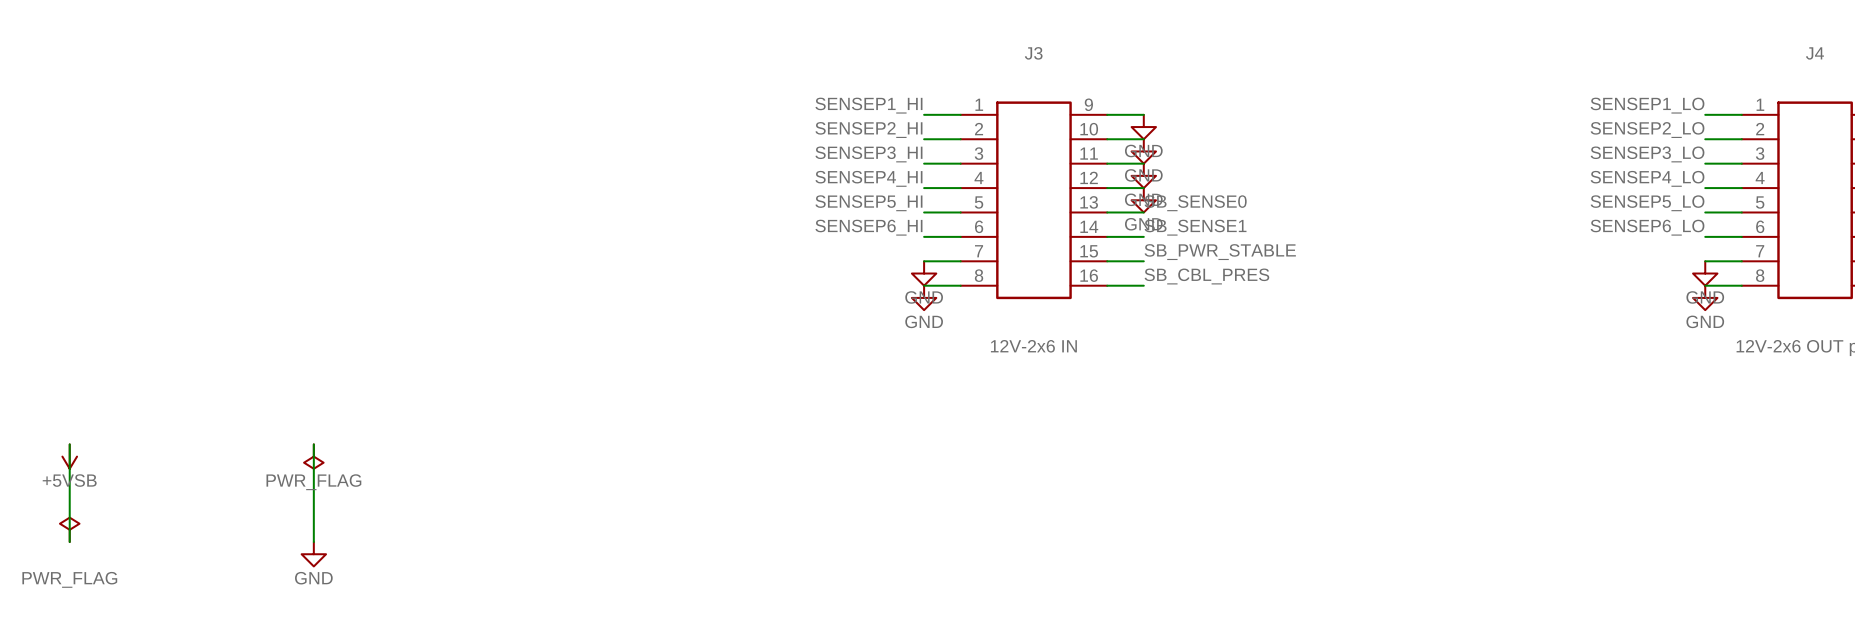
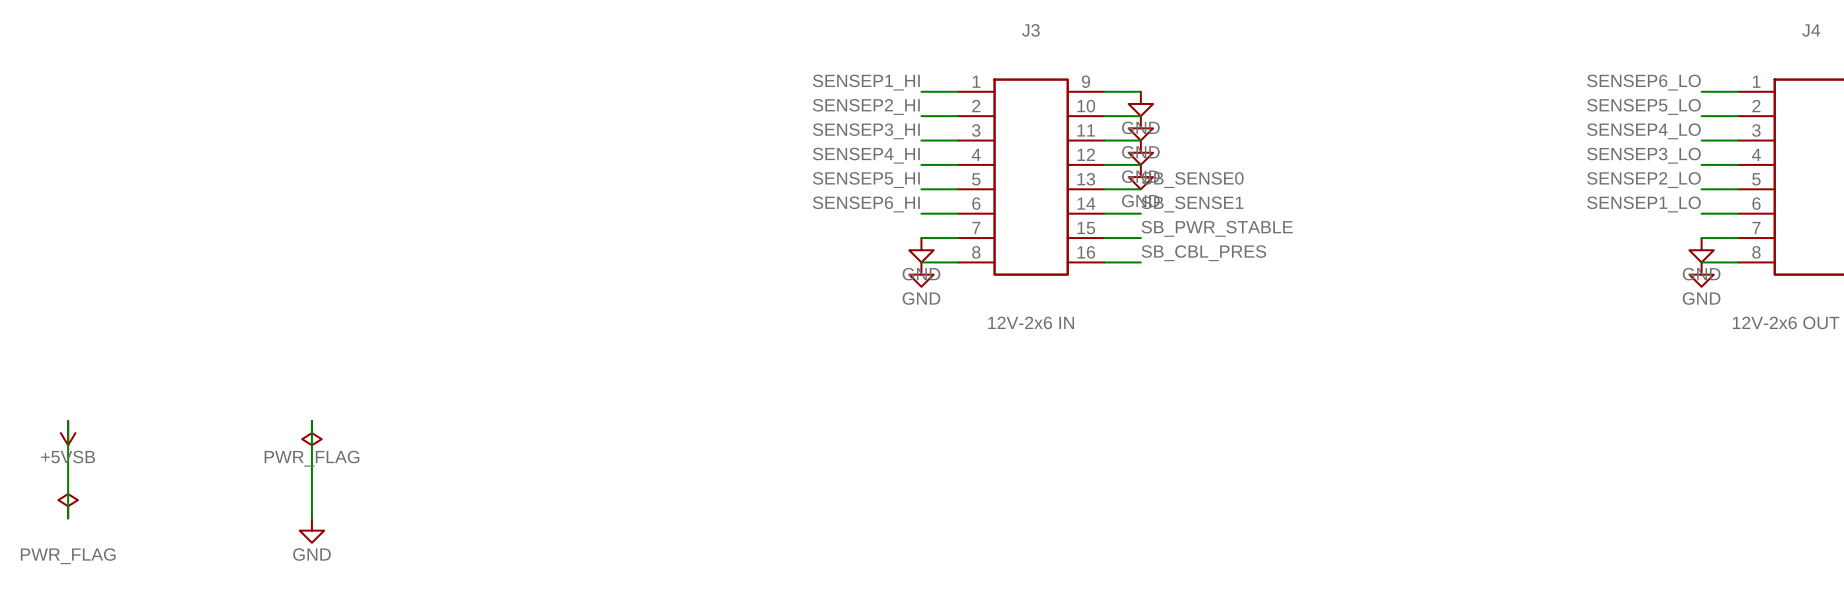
label: SENSEP1_LO (1647, 105) -> SENSEP6_LO (1643, 82)
label: SENSEP2_LO (1647, 130) -> SENSEP5_LO (1643, 106)
label: SENSEP3_LO (1647, 154) -> SENSEP4_LO (1643, 131)
label: SENSEP4_LO (1647, 178) -> SENSEP3_LO (1643, 155)
label: SENSEP5_LO (1647, 203) -> SENSEP2_LO (1643, 180)
label: SENSEP6_LO (1647, 227) -> SENSEP1_LO (1643, 204)

